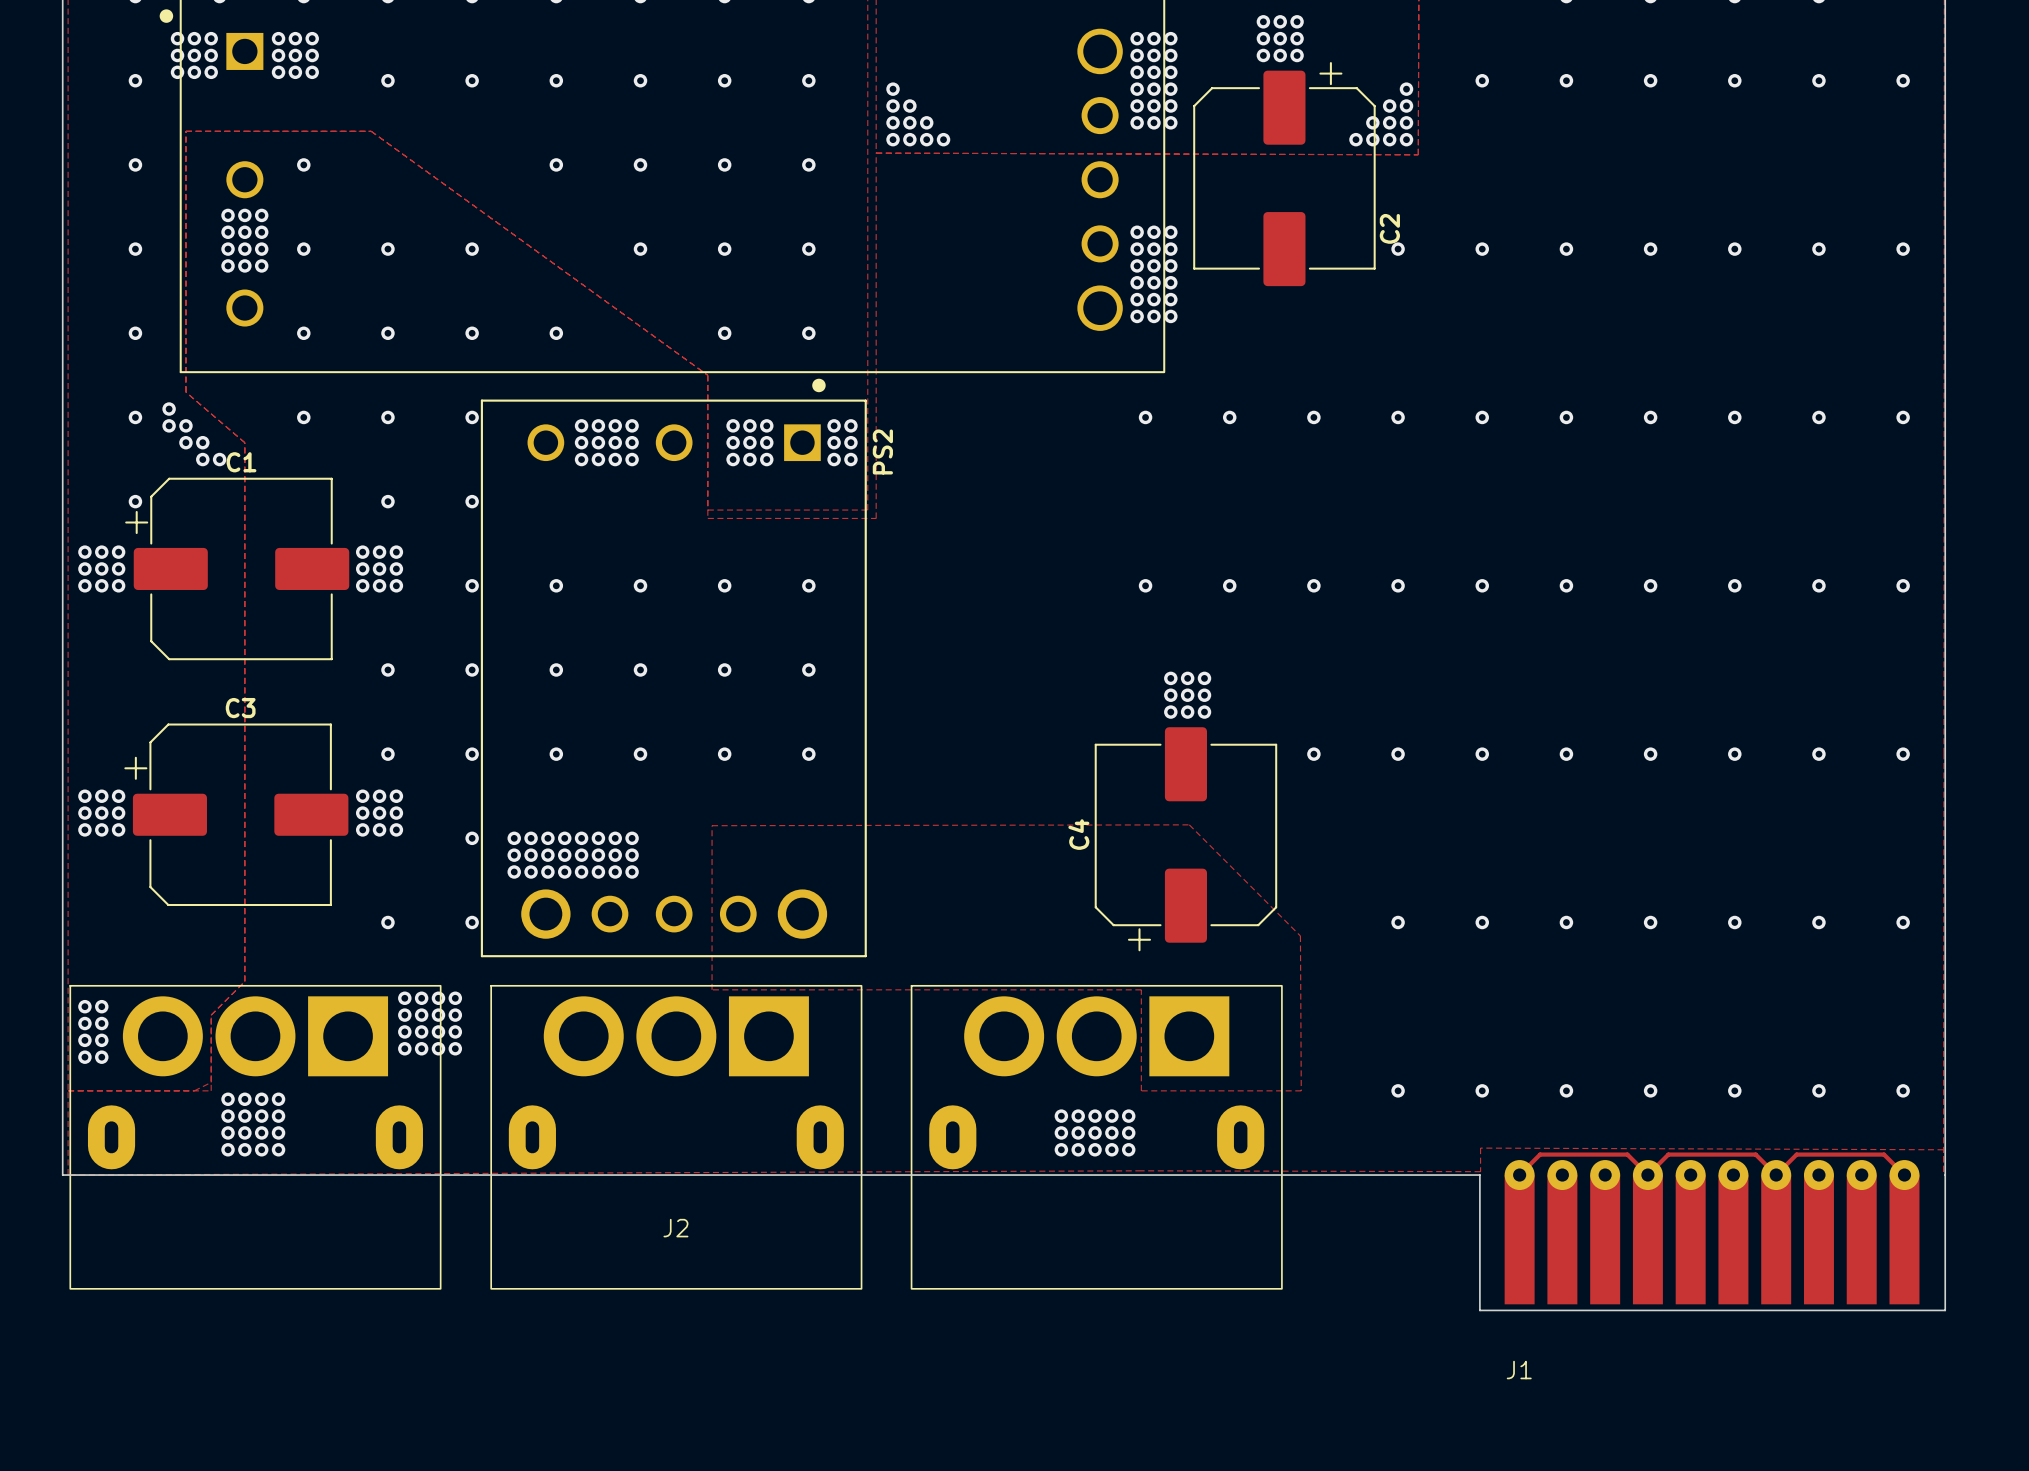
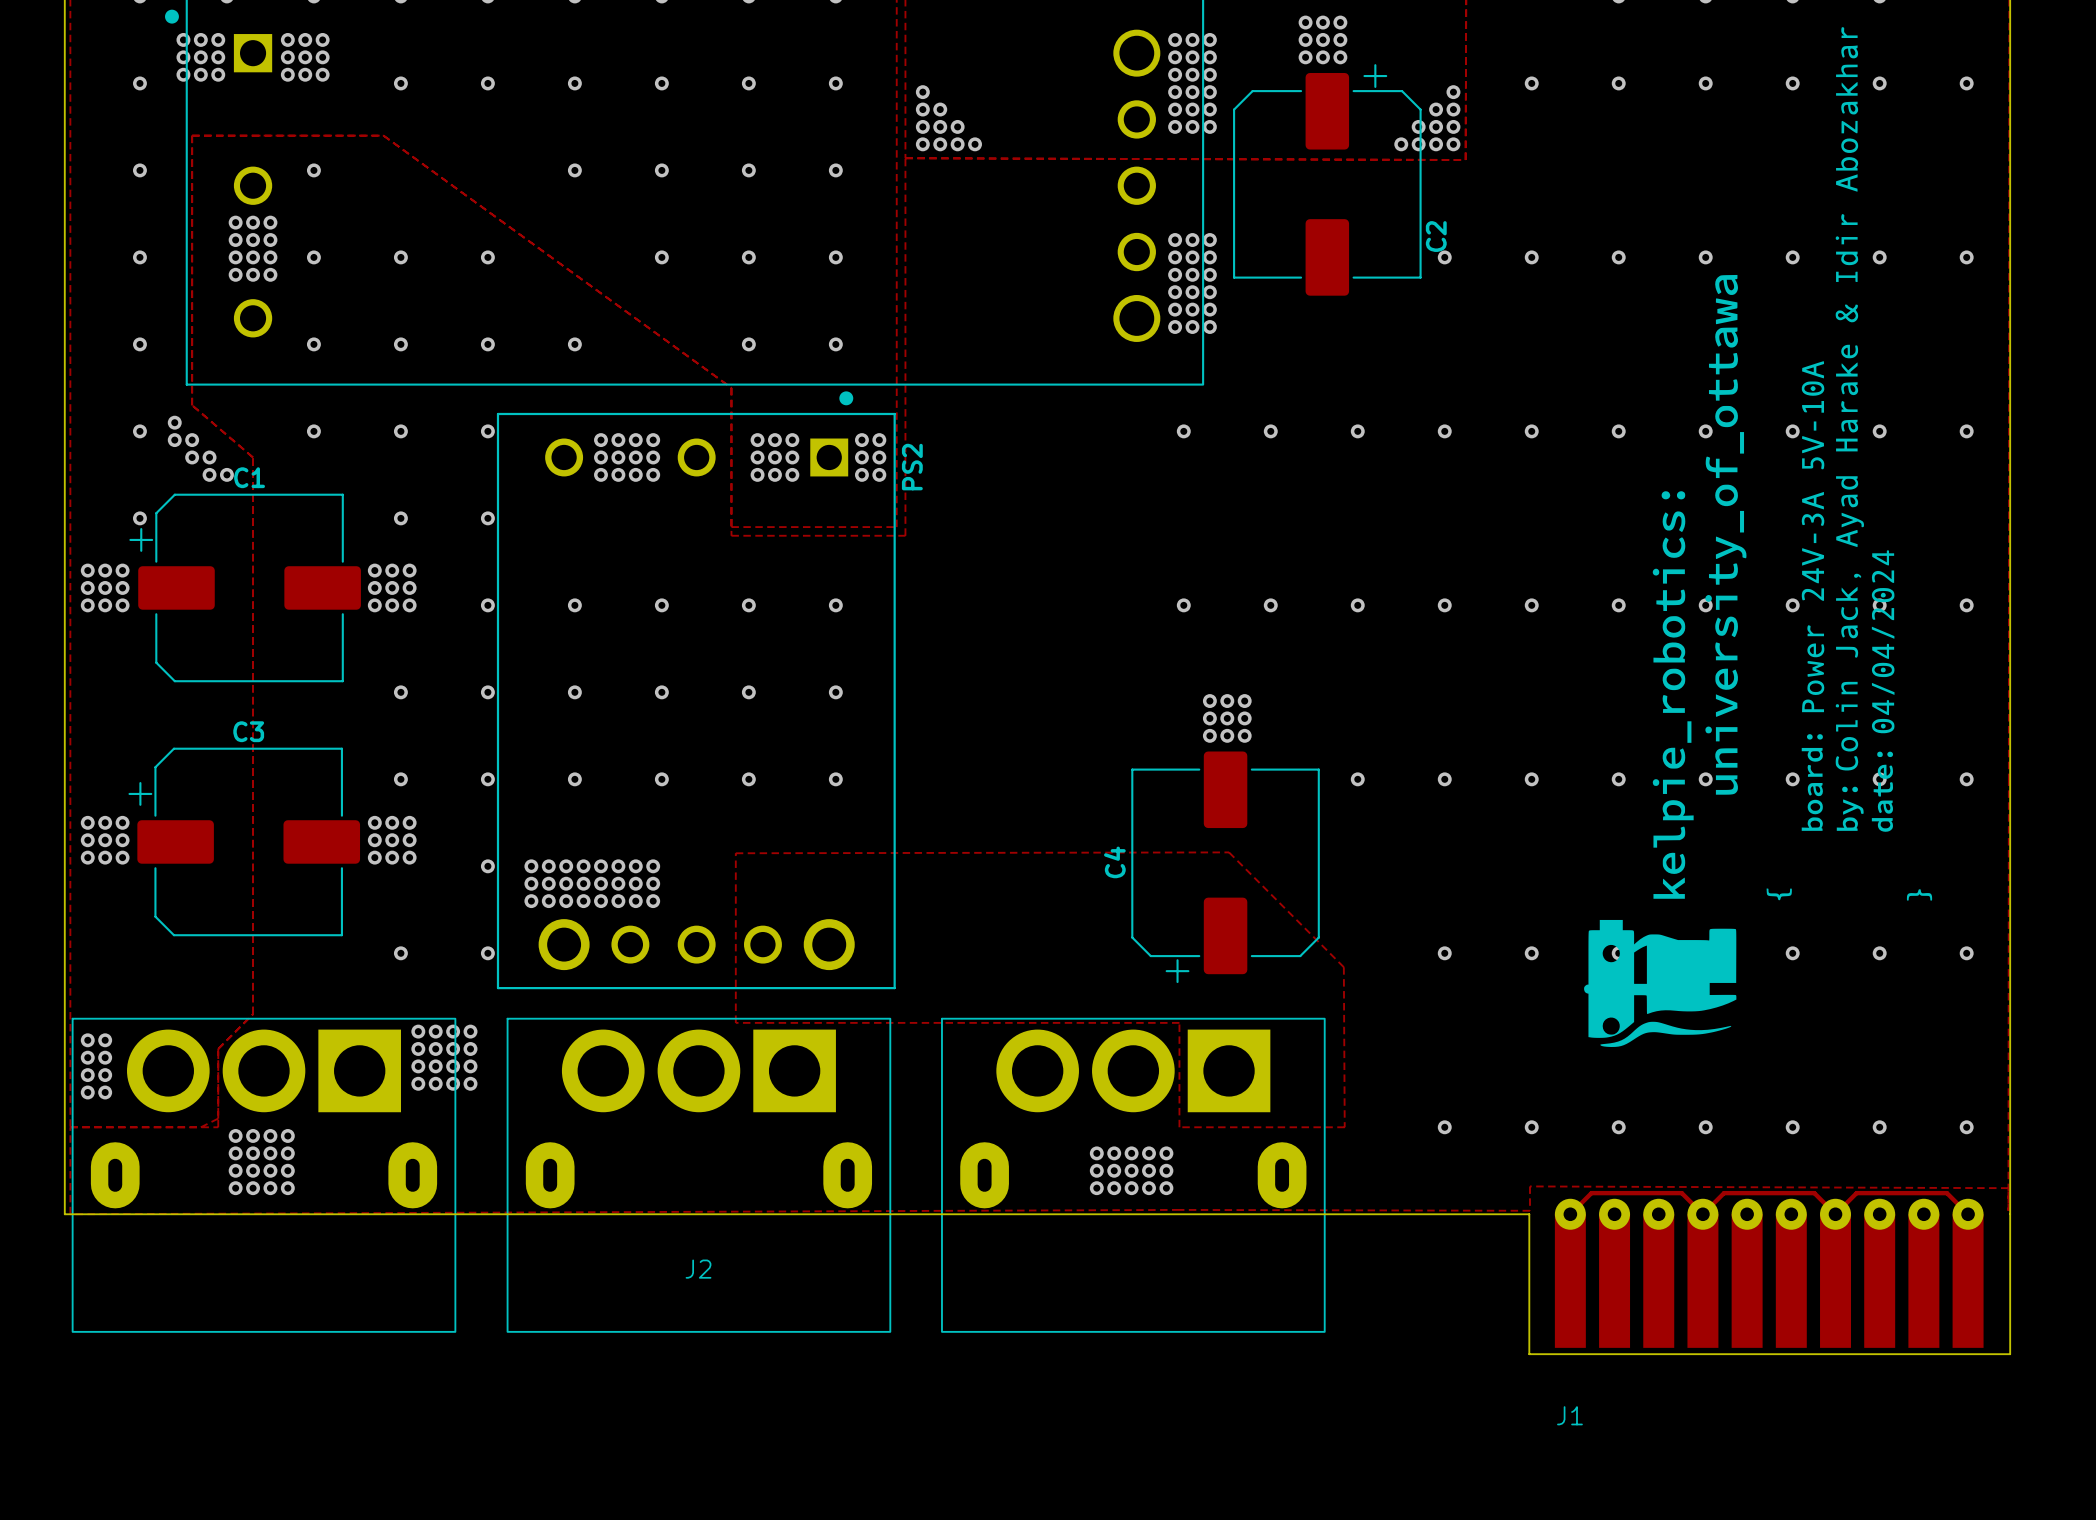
drawing: none -> [1584, 27, 1933, 1047]

